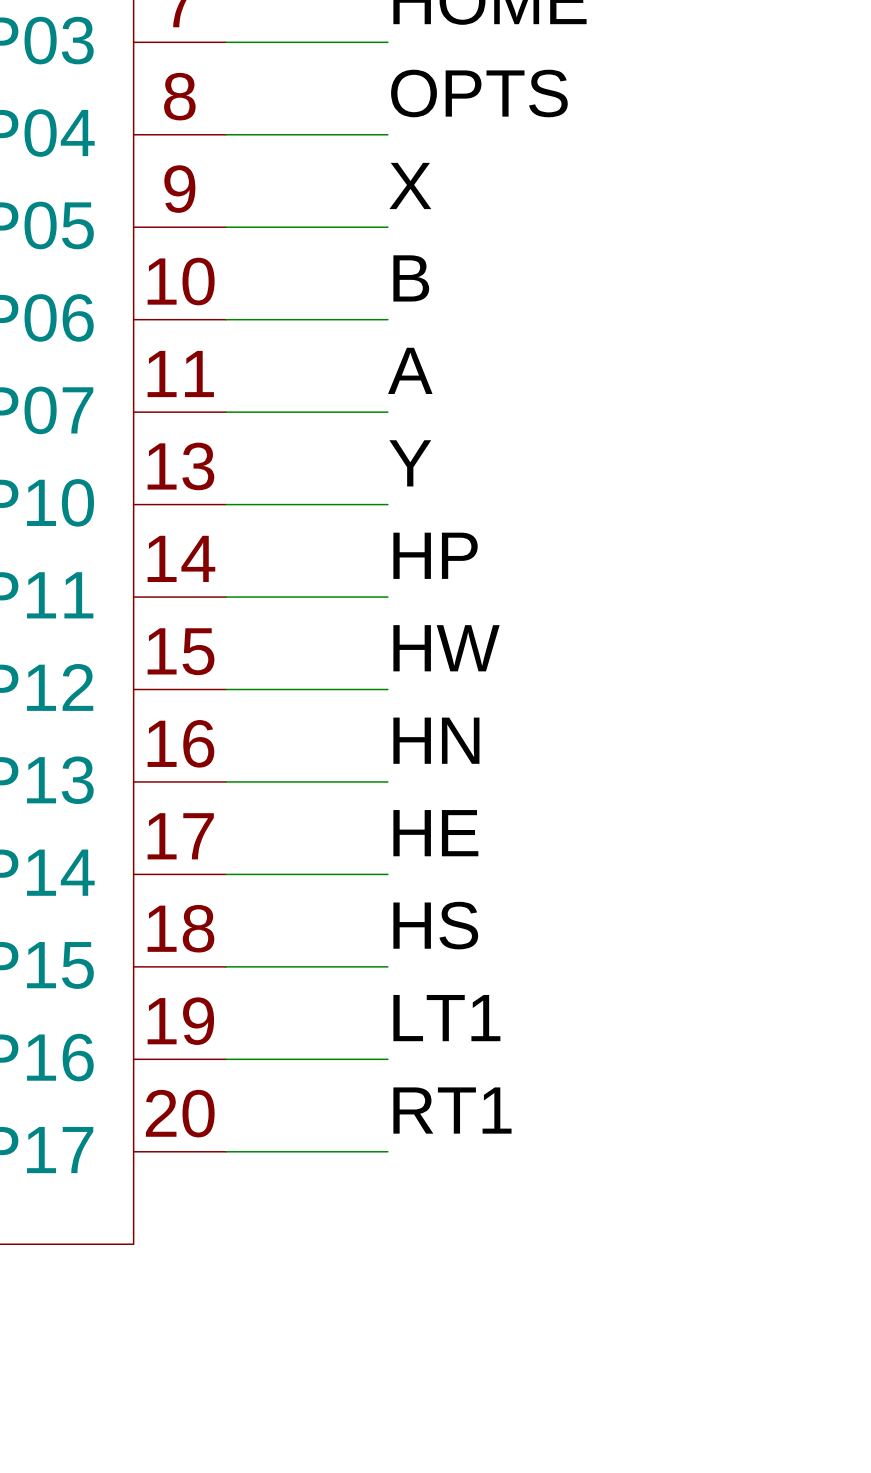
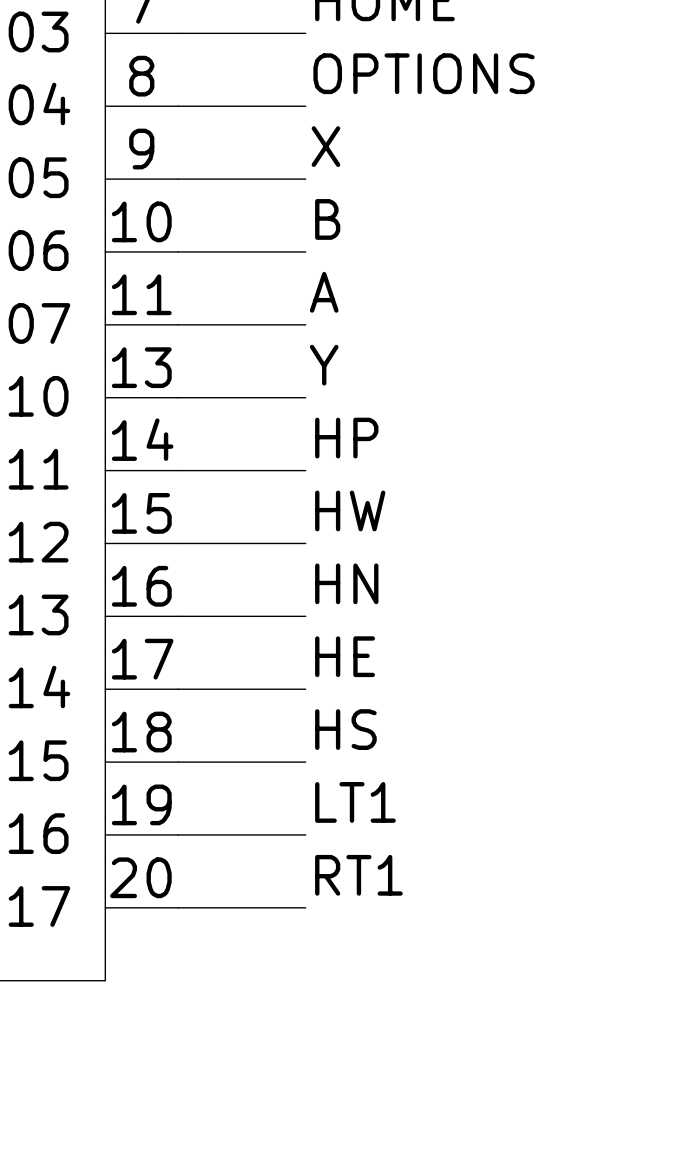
label: OPTS (479, 93) -> OPTIONS (423, 73)

